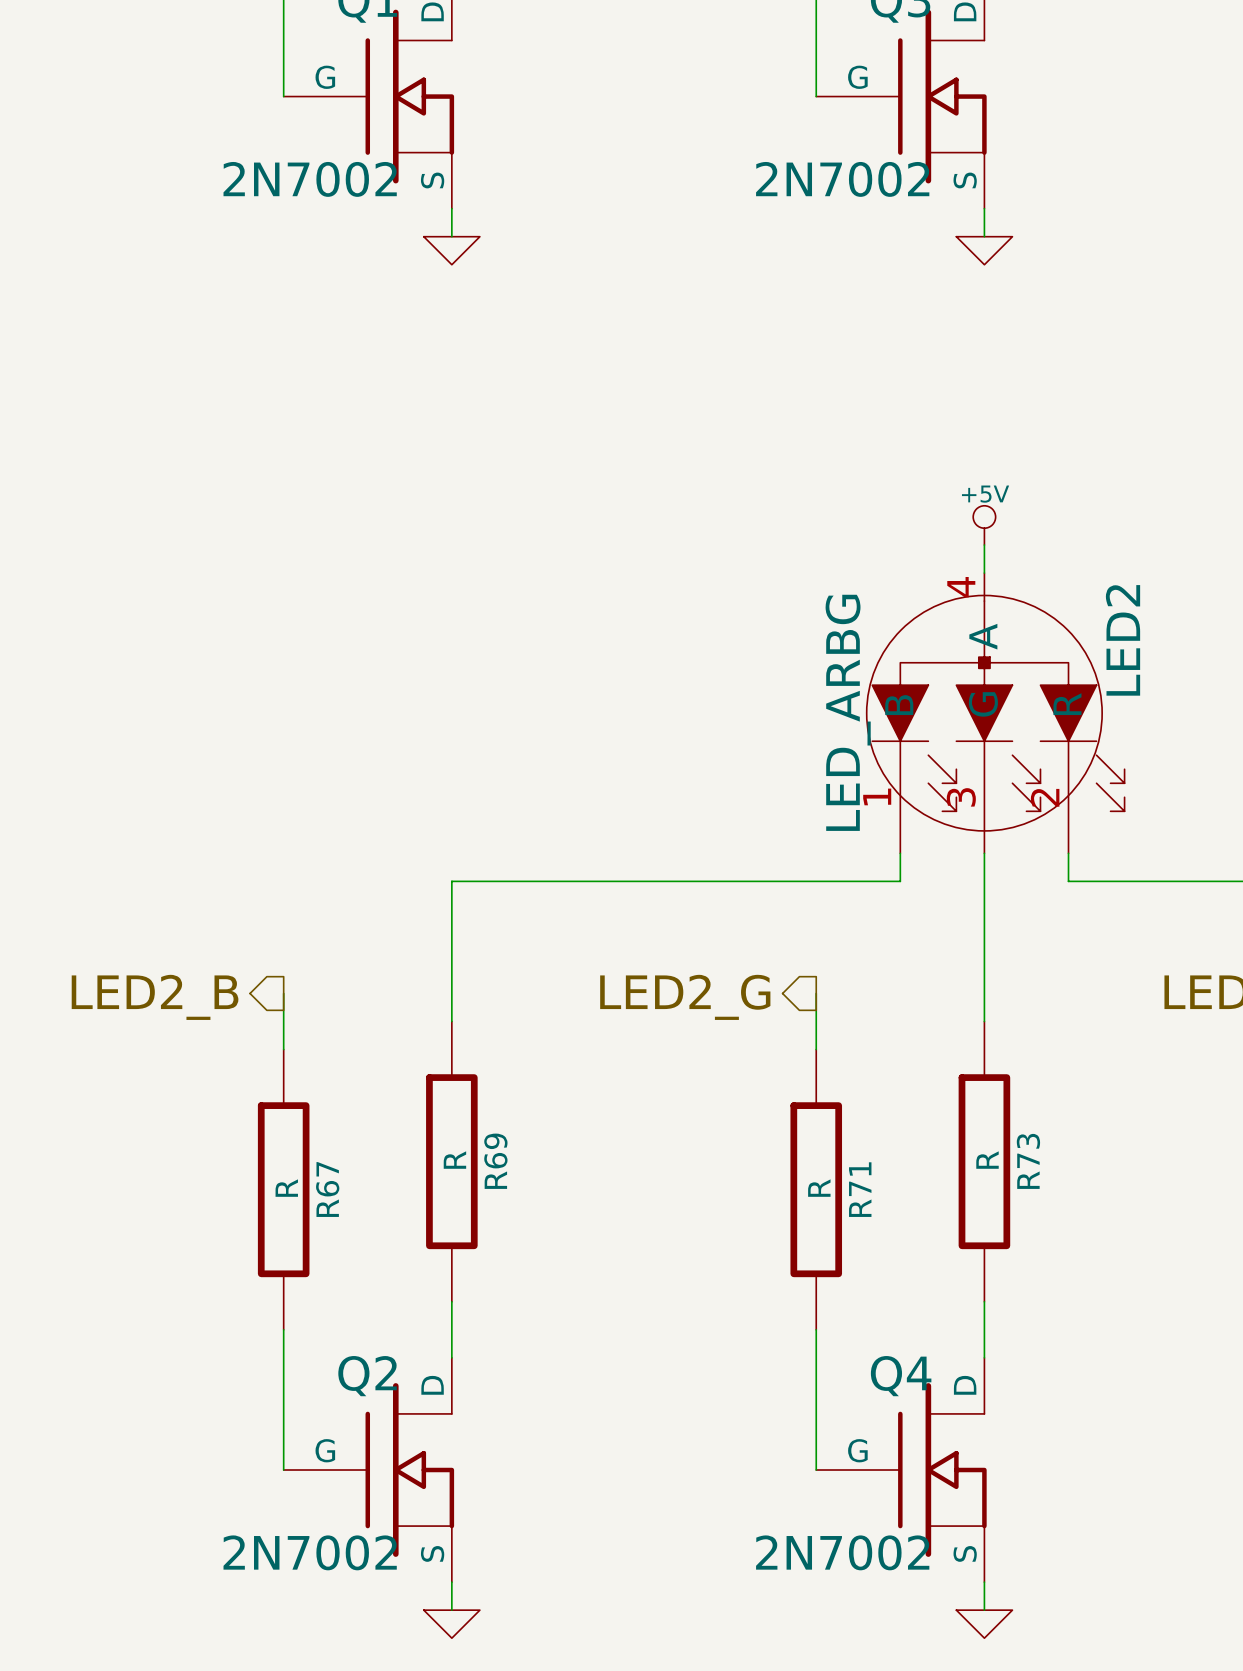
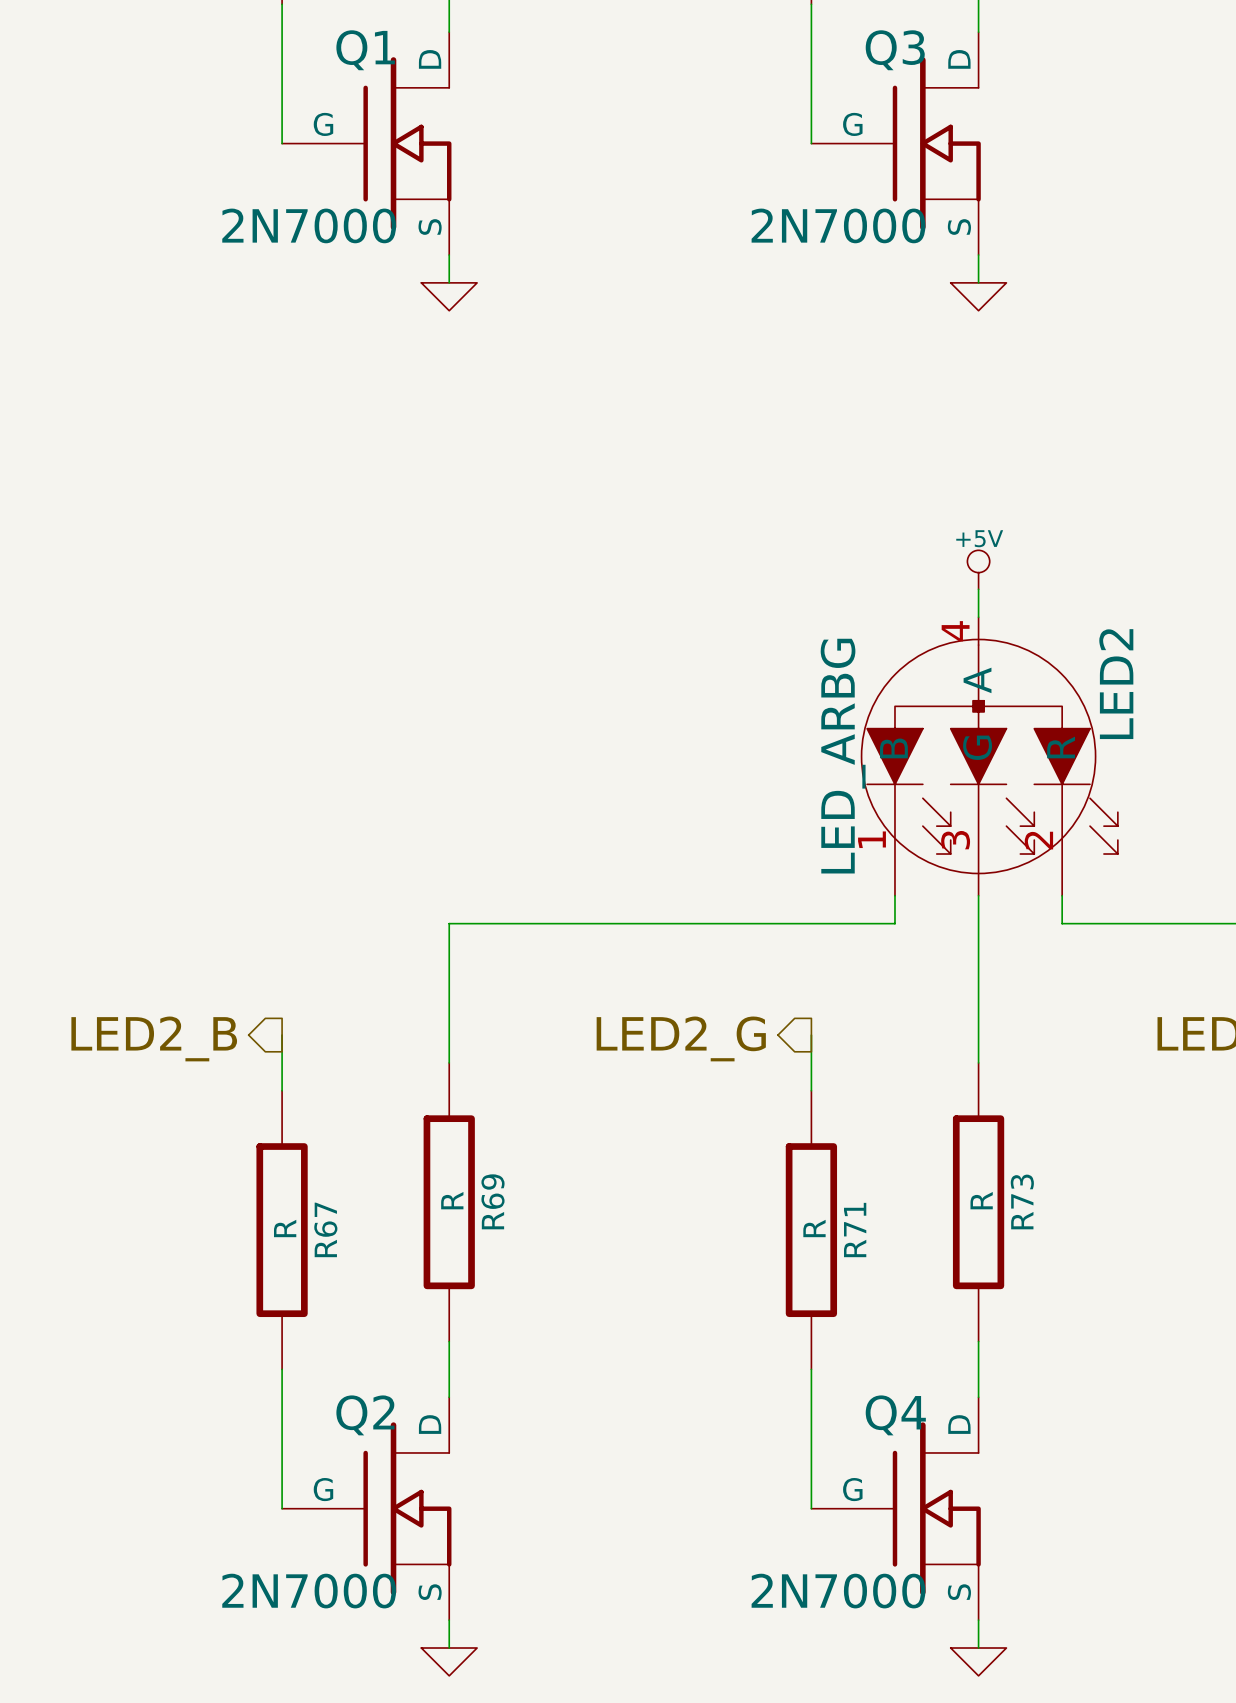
Q1 value: 2N7002 (310, 179) -> 2N7000 (309, 225)
Q3 value: 2N7002 (842, 179) -> 2N7000 (838, 225)
Q2 value: 2N7002 (310, 1552) -> 2N7000 (309, 1591)
Q4 value: 2N7002 (842, 1552) -> 2N7000 (838, 1591)

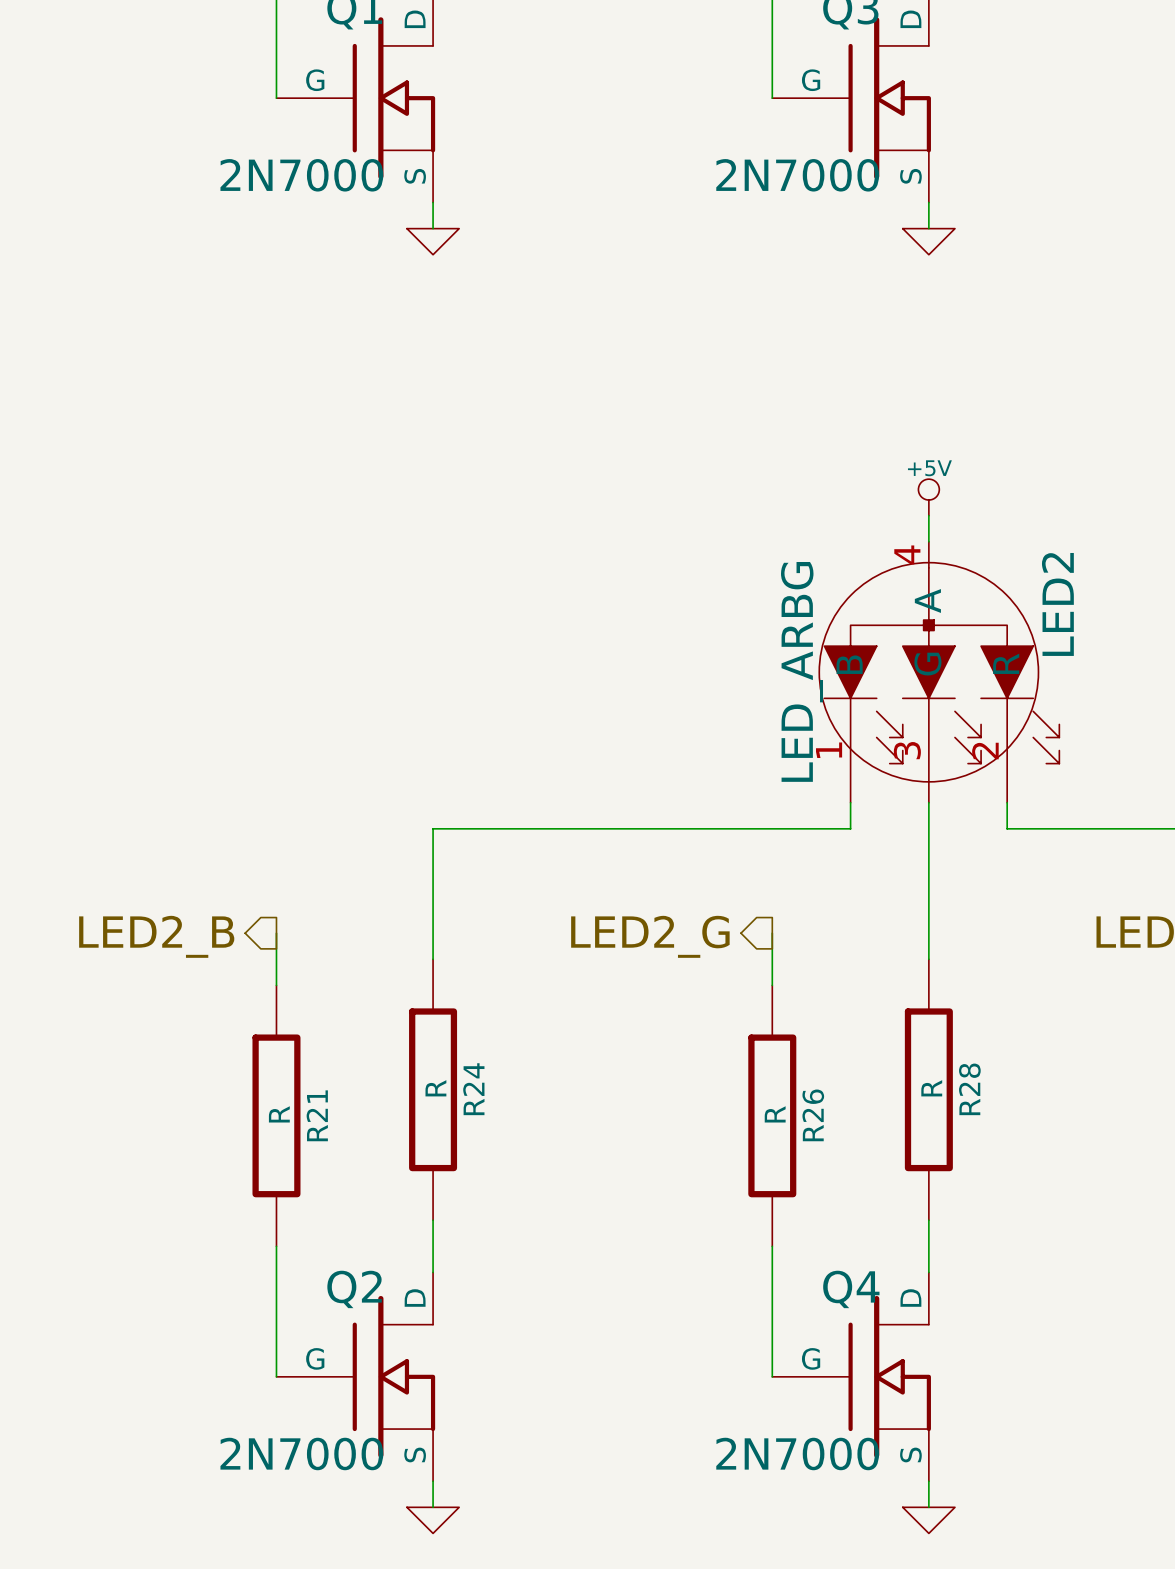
R69 name: R69 (492, 1201) -> R24 (473, 1089)
R73 name: R73 (1022, 1201) -> R28 (969, 1089)
R67 name: R67 (325, 1229) -> R21 (317, 1115)
R71 name: R71 (855, 1230) -> R26 (813, 1115)

